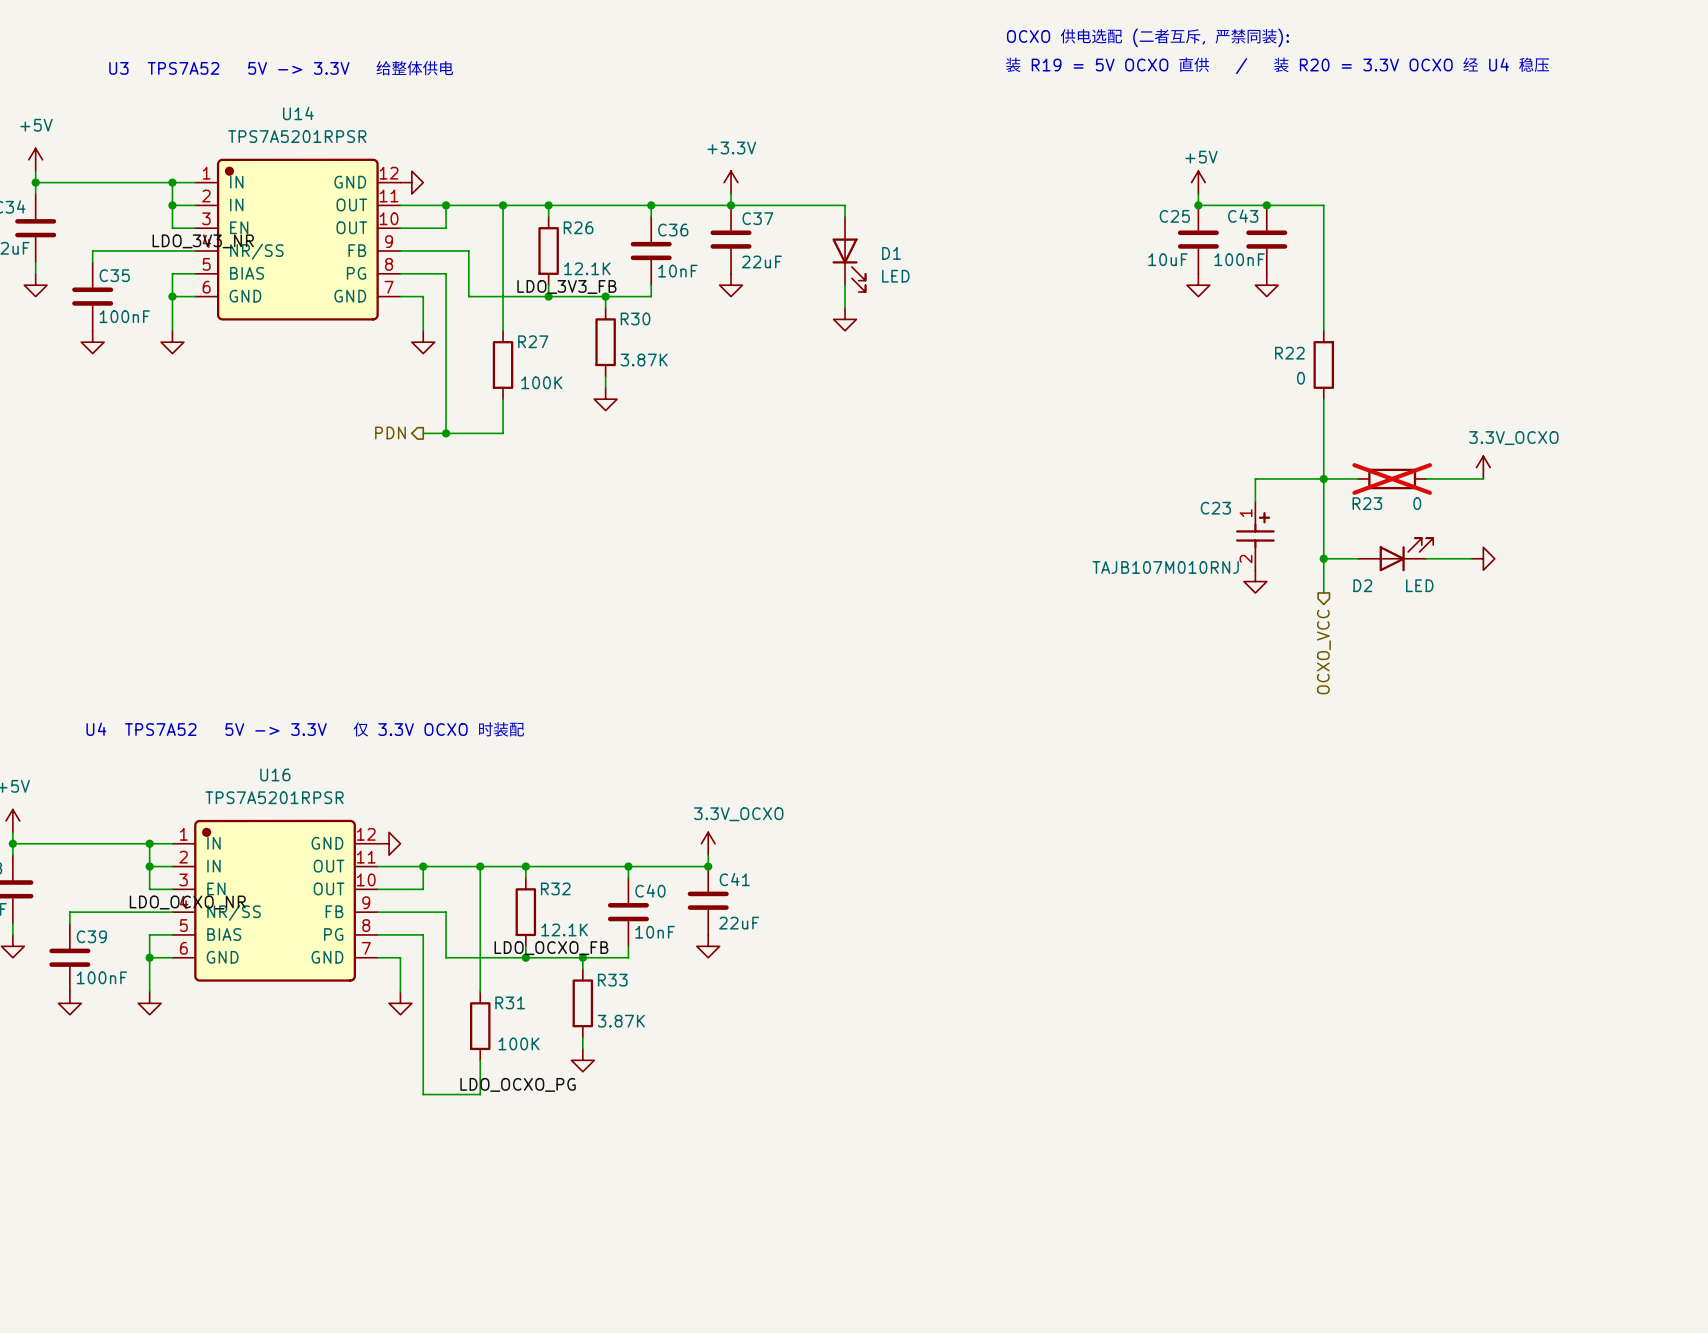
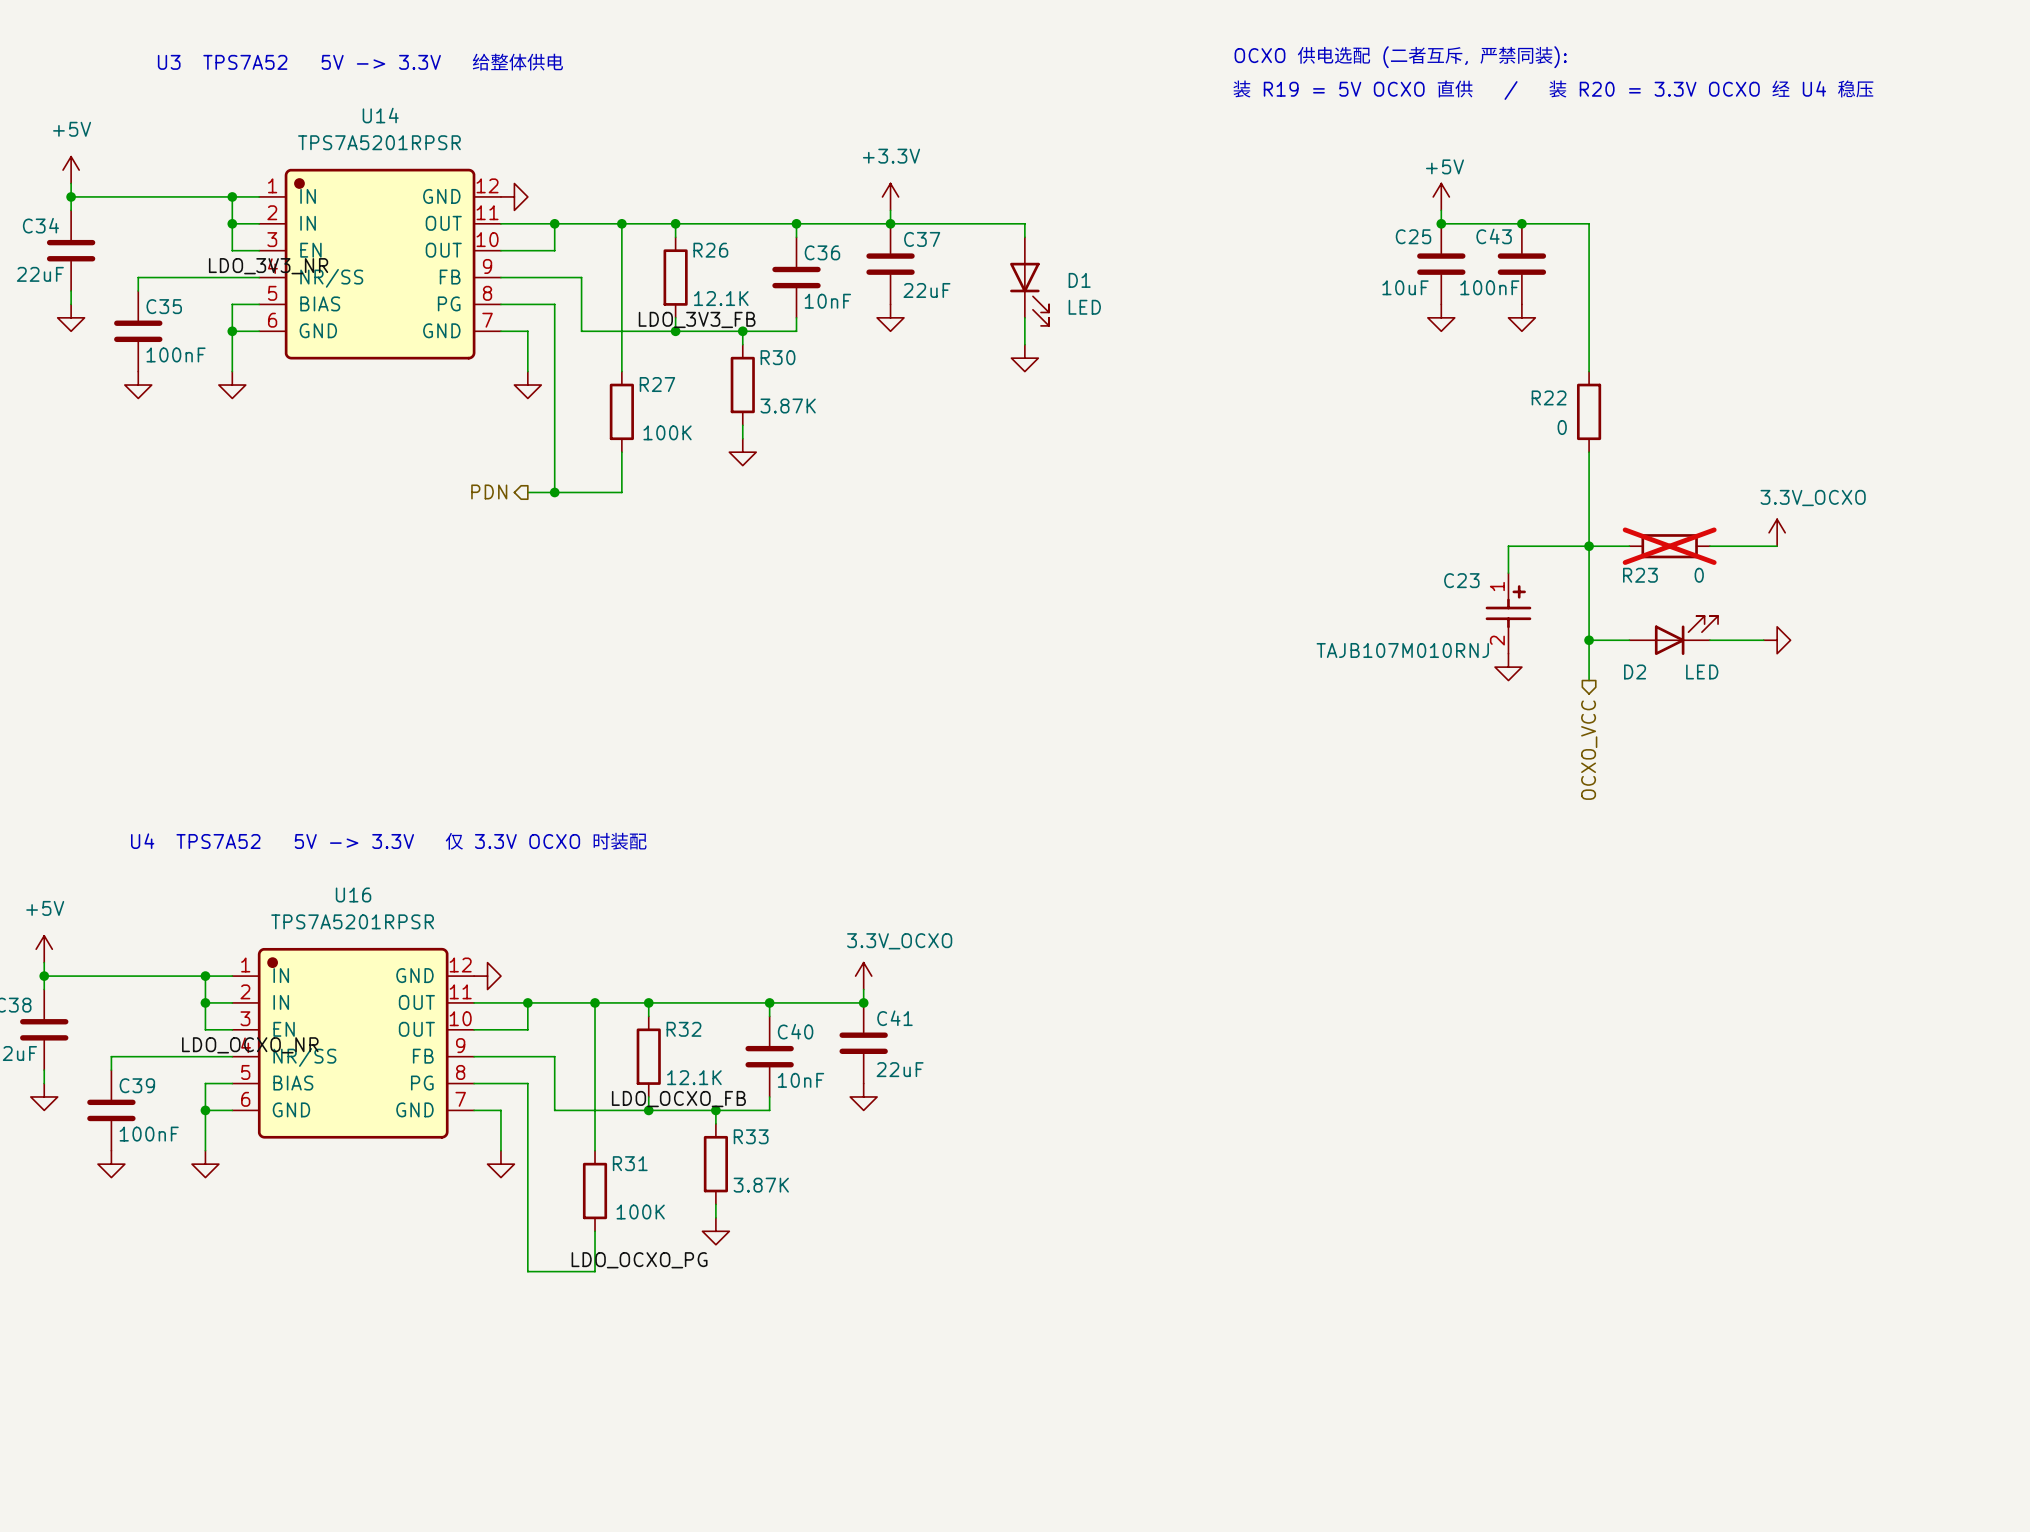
text position: OCXO 供电选配 (二者互斥, 严禁同装): (1147, 37) -> OCXO 供电选配 (二者互斥, 严禁同装): (1400, 57)
text position: 装 R19 = 5V OCXO 直供 / 装 R20 = 3.3V OCXO 经 U4 稳压 (1277, 65) -> 装 R19 = 5V OCXO 直供 / 装 R20 = 3.3V OCXO 经 U4 稳压 (1553, 89)

